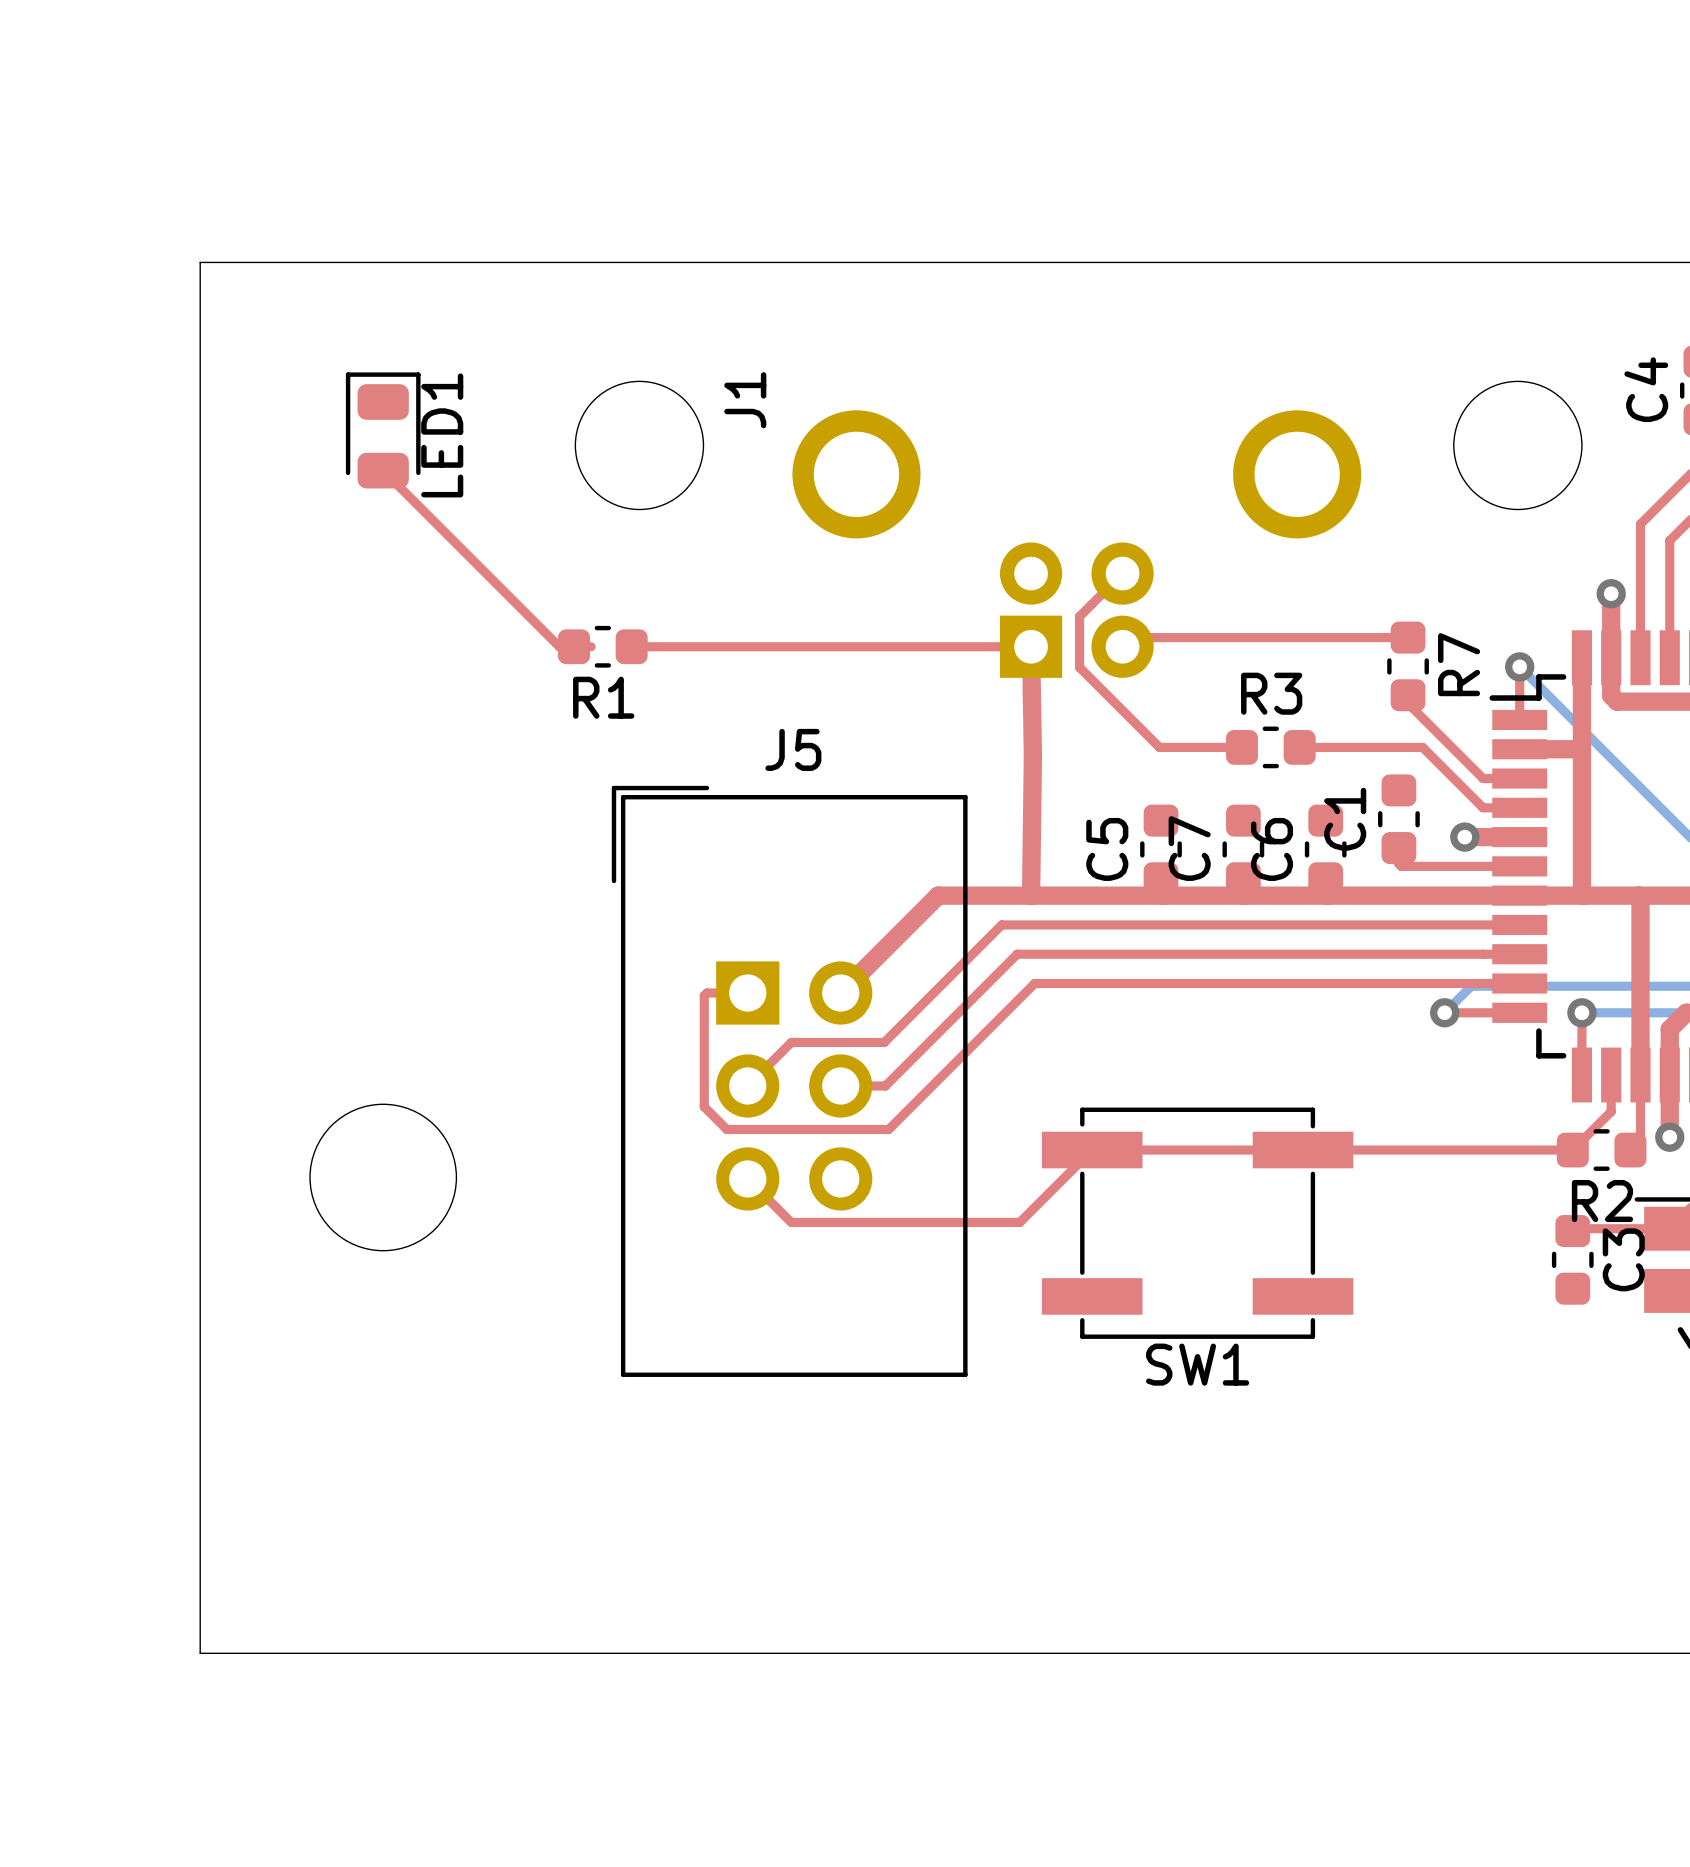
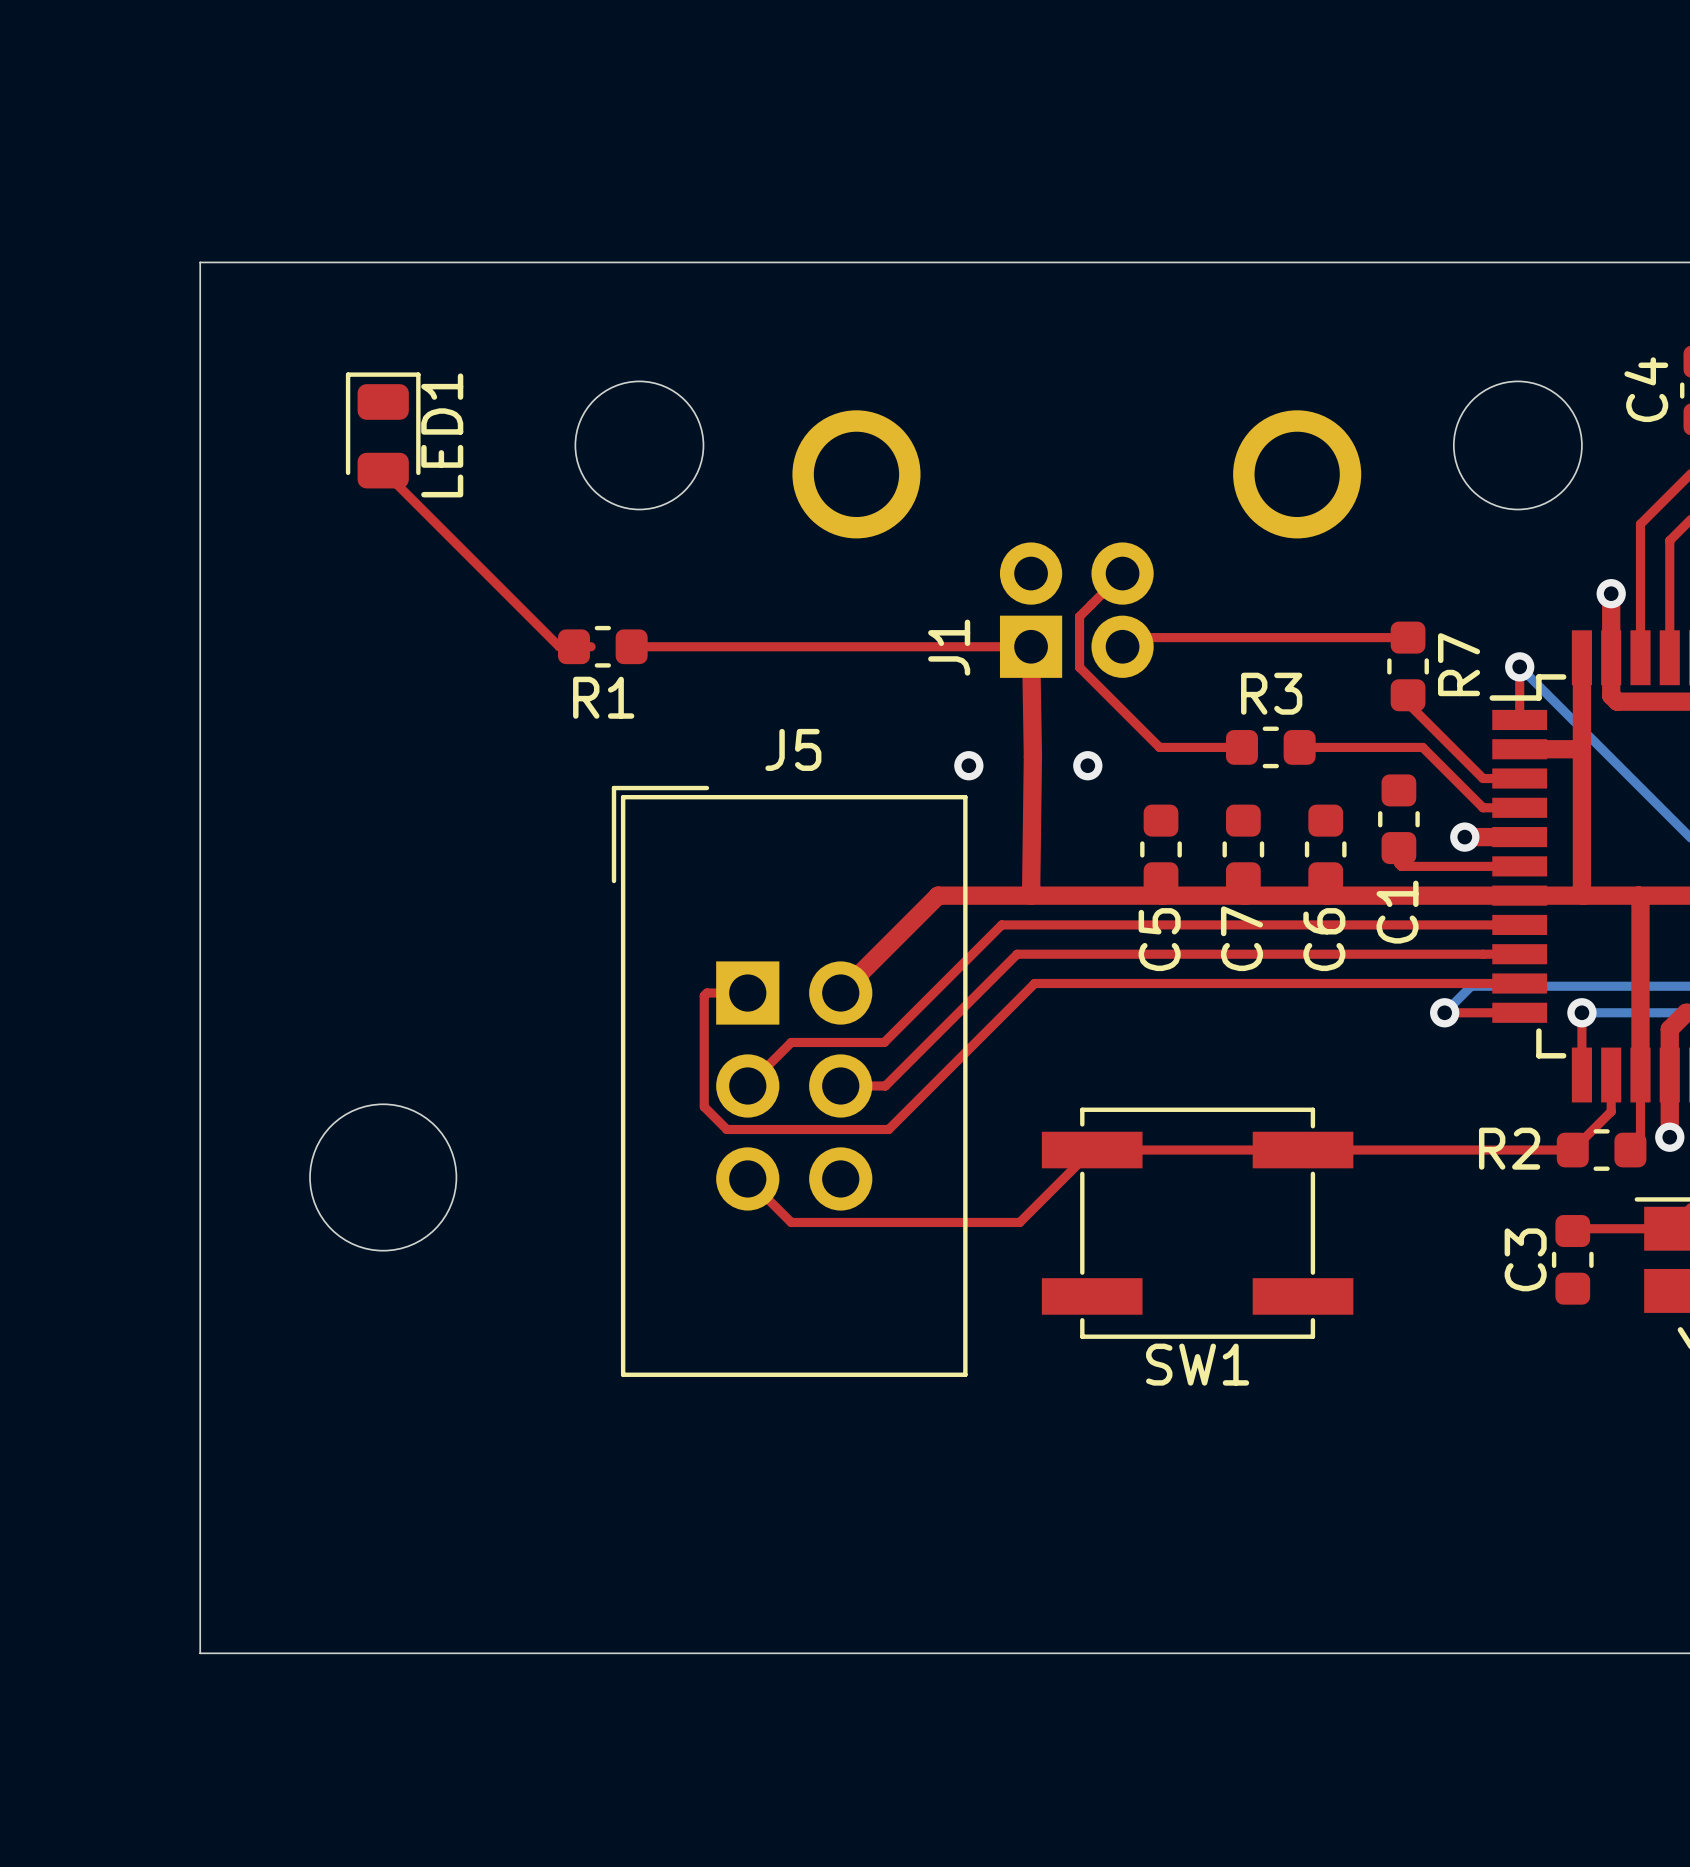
J1 name position: J1 (745, 400) -> J1 (949, 647)
via: none -> (968, 765)
via: none -> (1087, 765)
C1 name position: C1 (1345, 819) -> C1 (1397, 912)
C7 name position: C7 (1189, 848) -> C7 (1241, 938)
C5 name position: C5 (1107, 849) -> C5 (1159, 939)
C6 name position: C6 (1272, 849) -> C6 (1324, 939)
R2 name position: R2 (1602, 1201) -> R2 (1509, 1148)
C3 name position: C3 (1623, 1259) -> C3 (1525, 1259)

